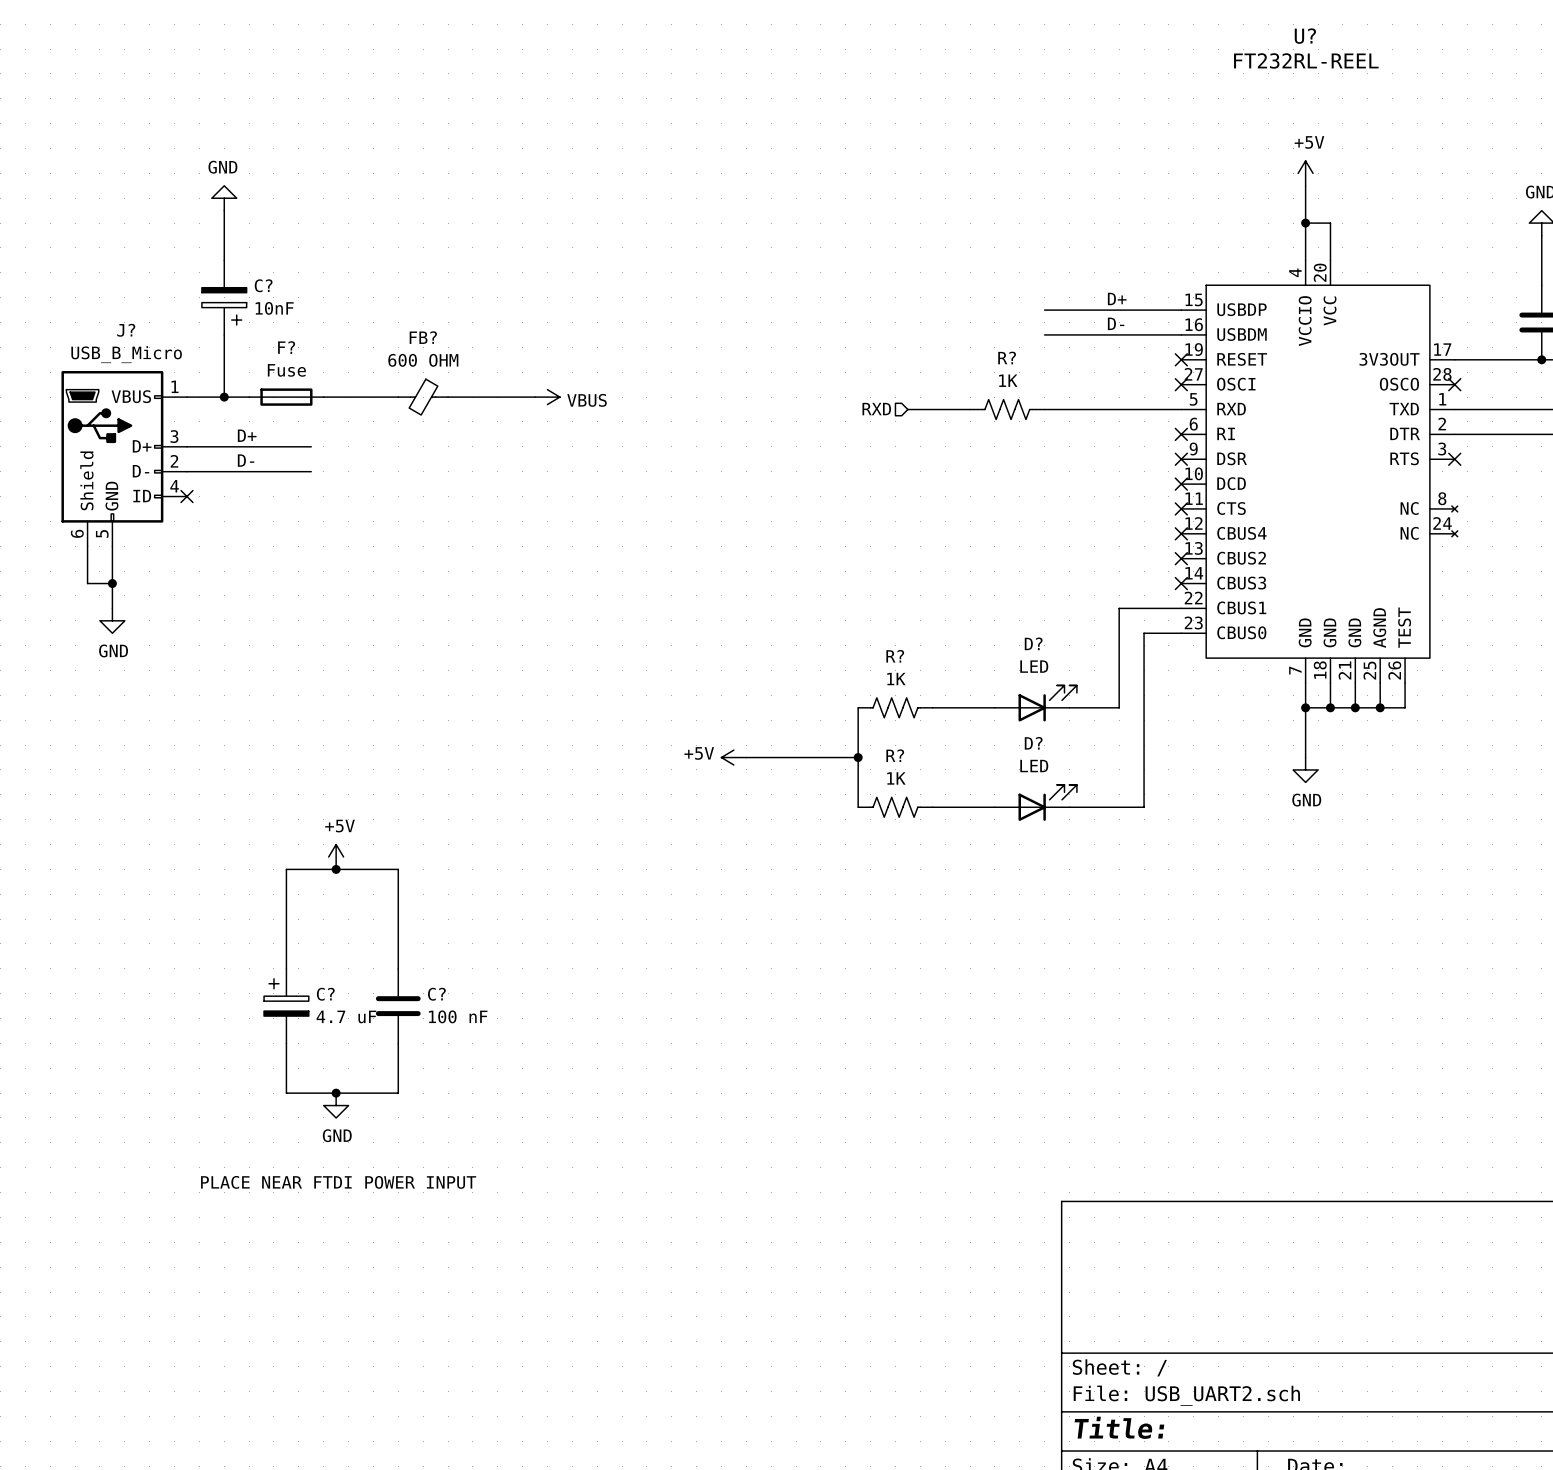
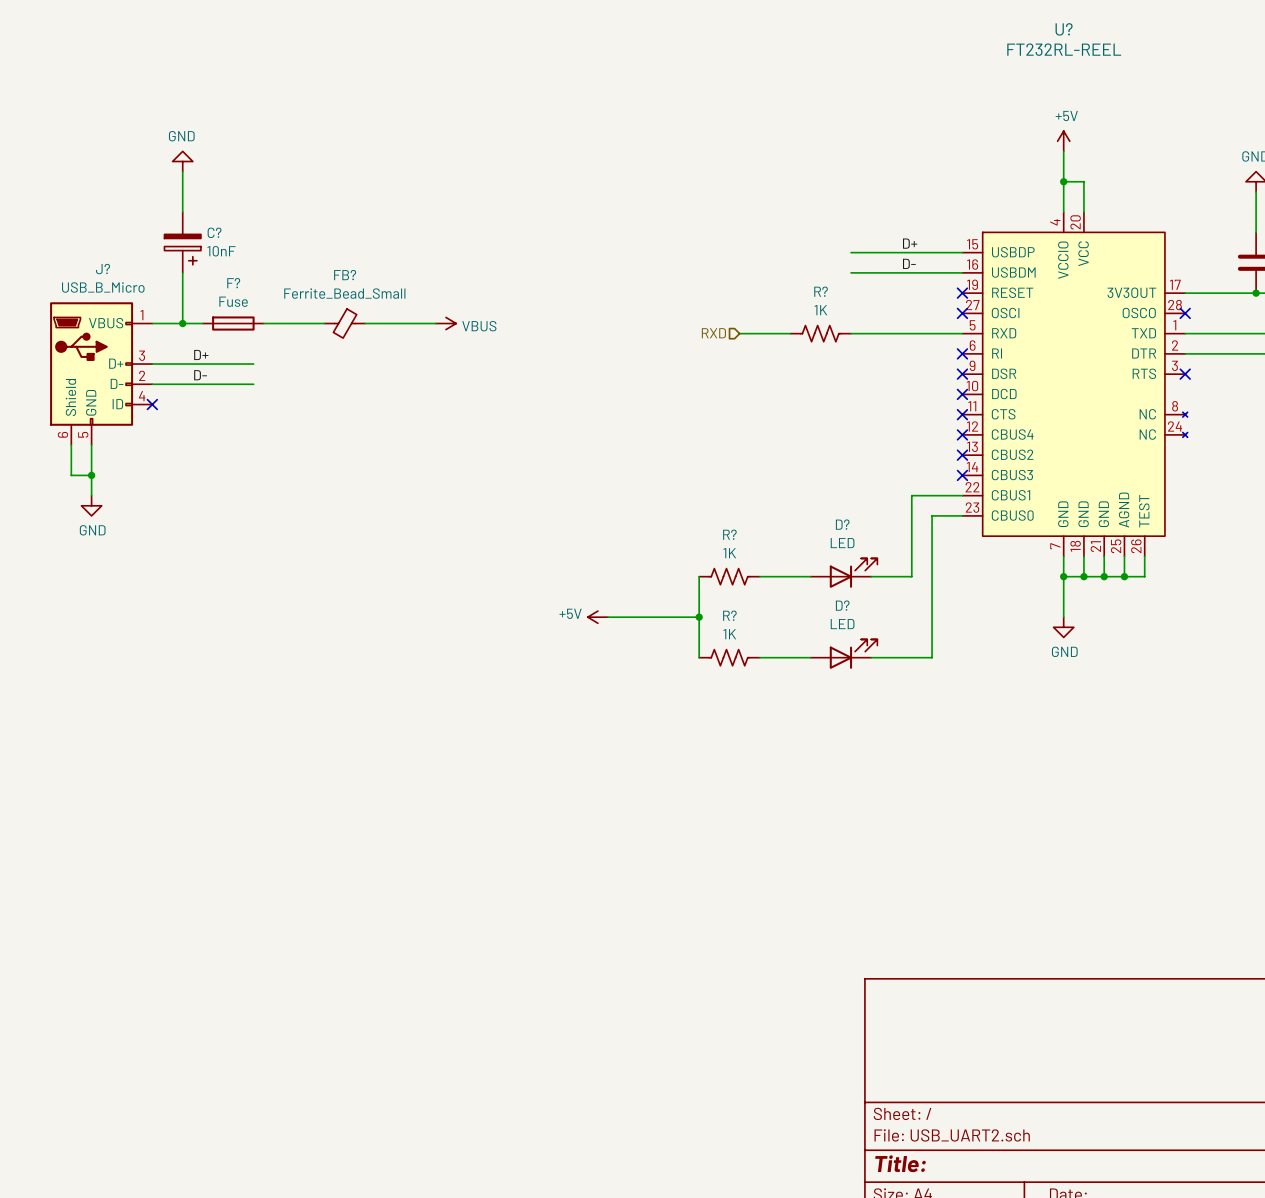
FB? value: 600 OHM (423, 360) -> Ferrite_Bead_Small (344, 293)
power symbol: +5V (336, 856) -> none
junction: (336, 869) -> none
wire: (286, 968) (286, 869) (398, 869) (398, 968) -> none
C?: 4.7 uF (286, 1006) -> none
C?: 100 nF (398, 1006) -> none
wire: (286, 1043) (286, 1093) (398, 1093) (398, 1043) -> none
junction: (336, 1093) -> none
power symbol: GND (336, 1105) -> none
text: PLACE NEAR FTDI POWER INPUT (338, 1182) -> none

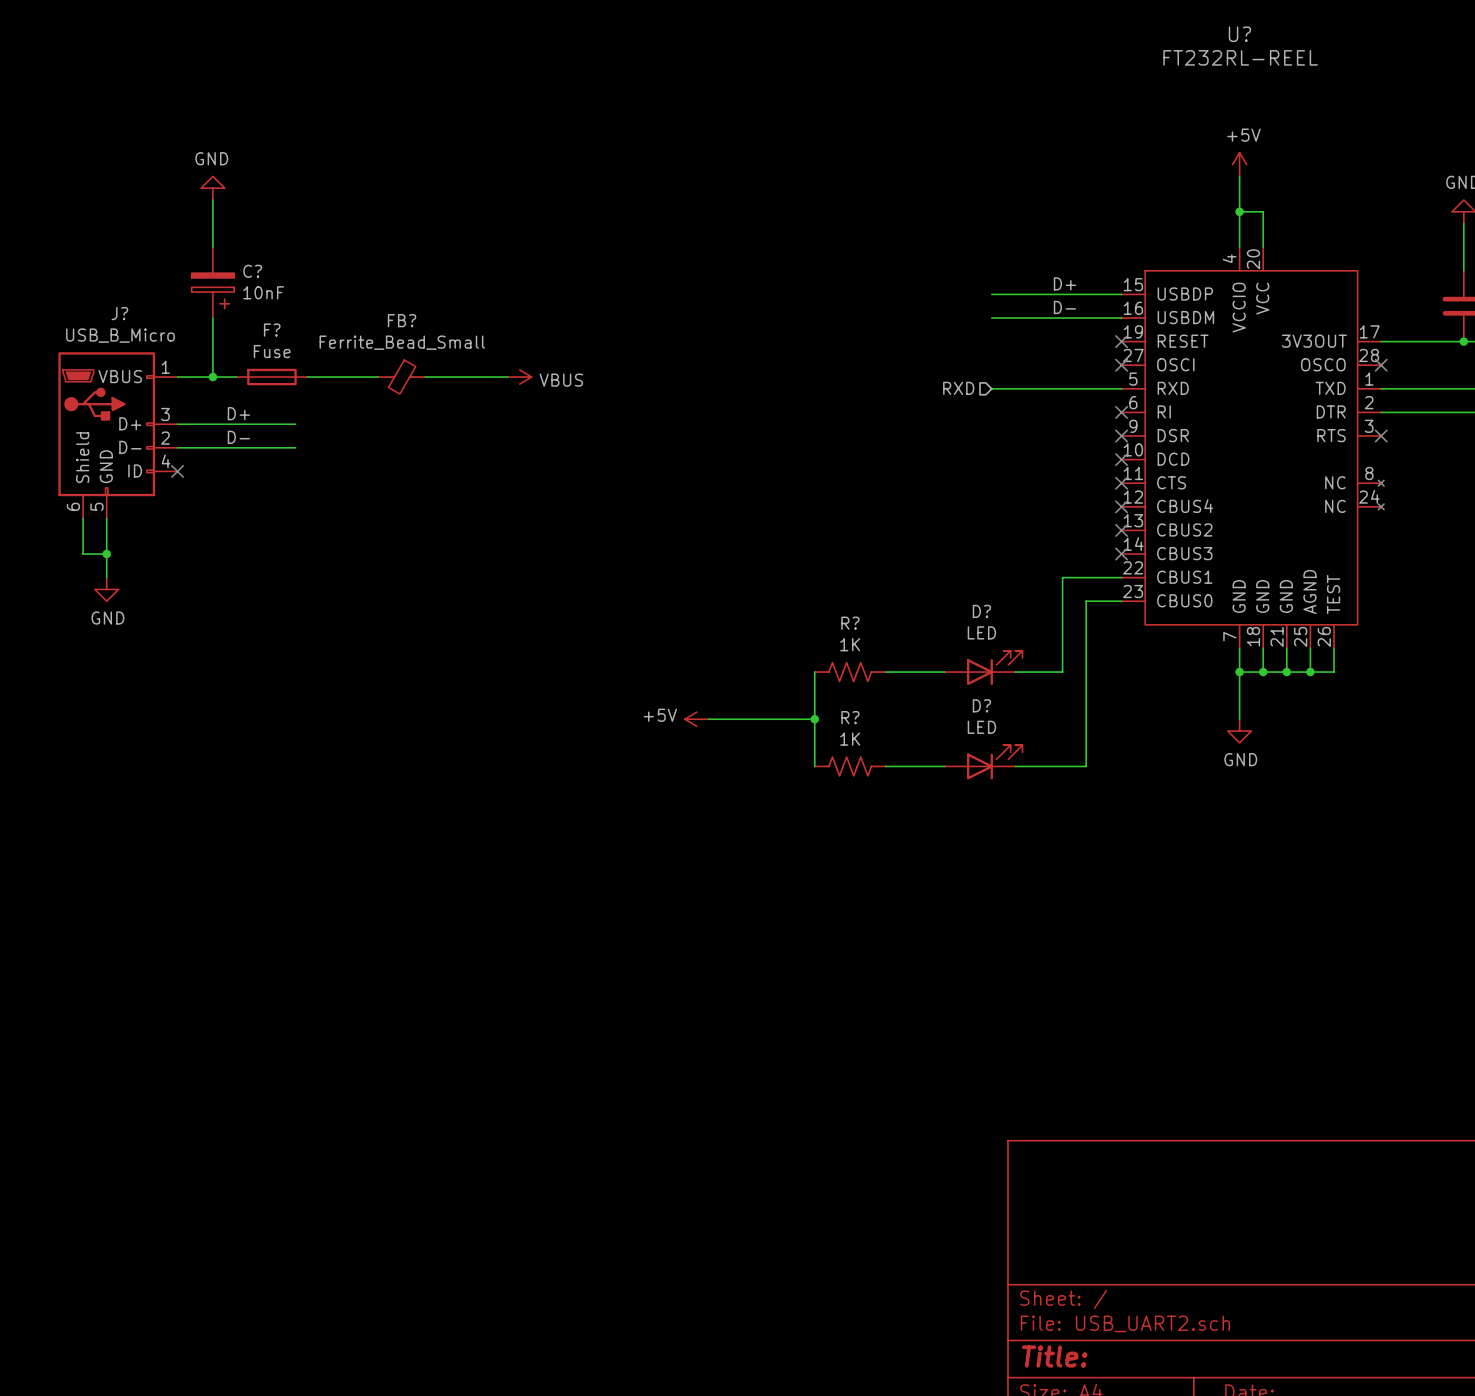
hierarchical label position: RXD (713, 333) -> RXD (958, 388)
wire: (739, 333) (790, 333) -> none
R?: 1K (820, 333) -> none

